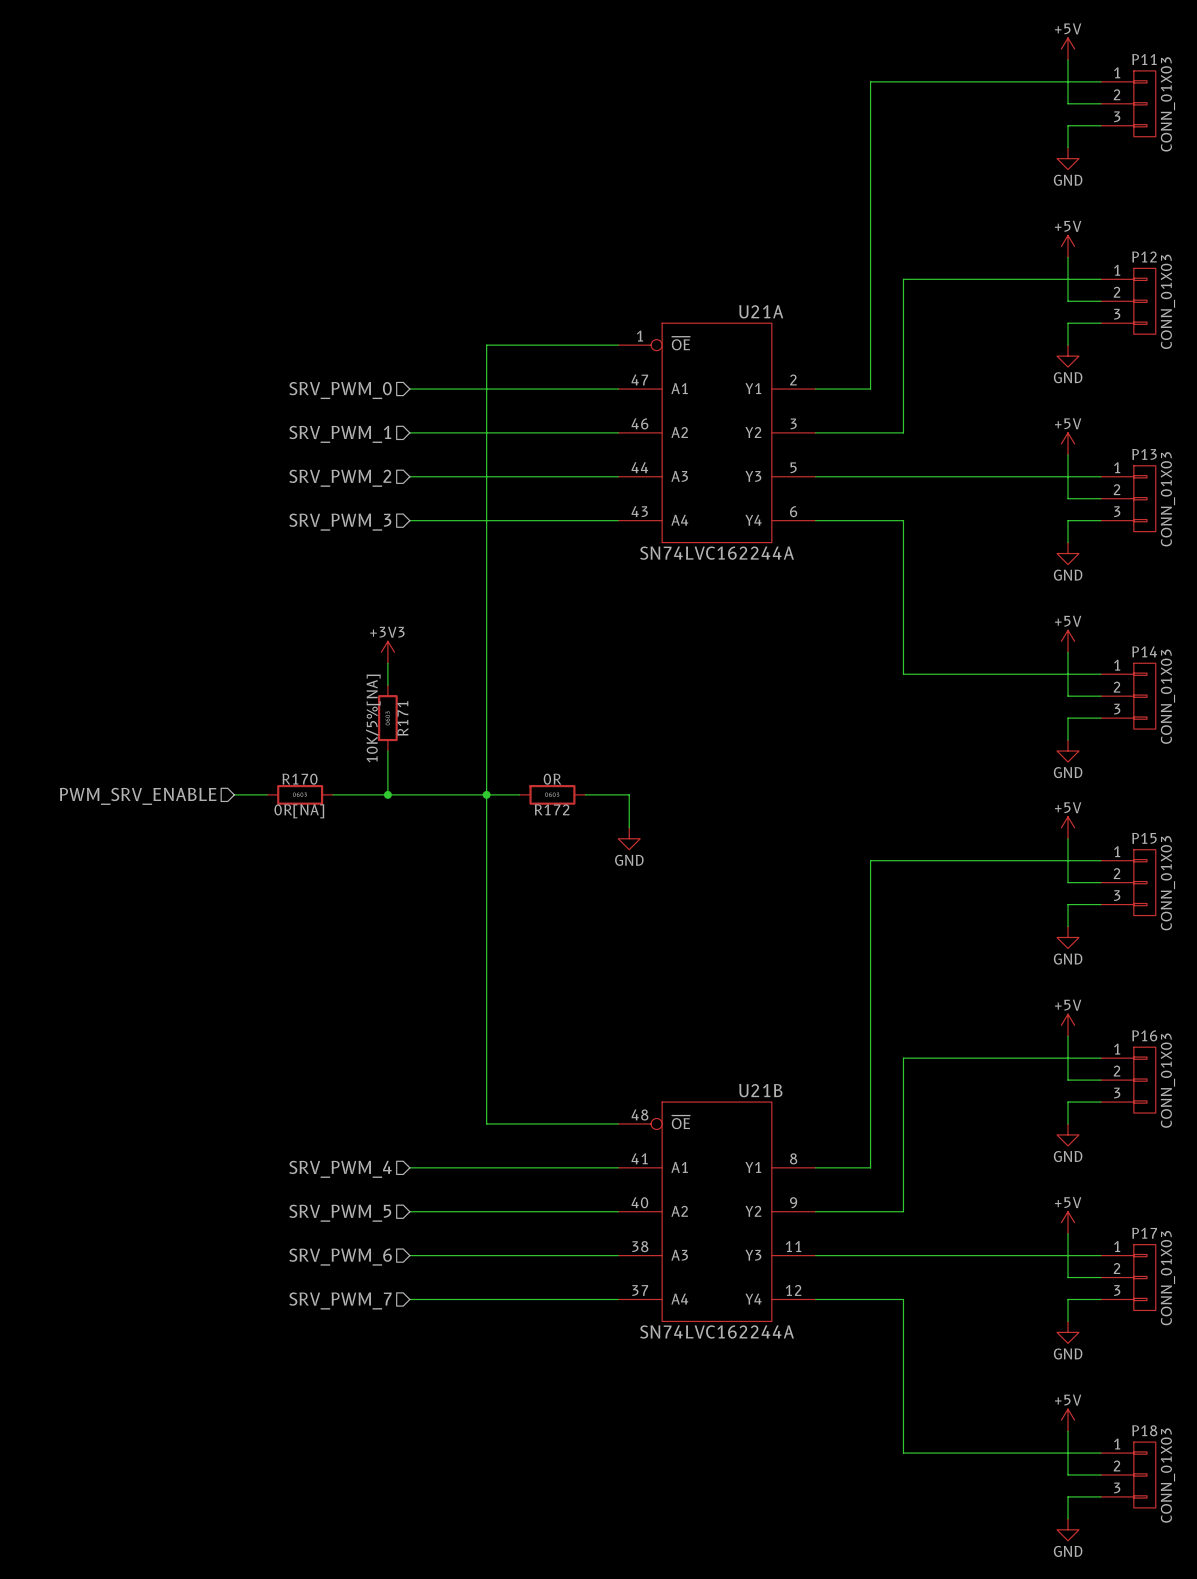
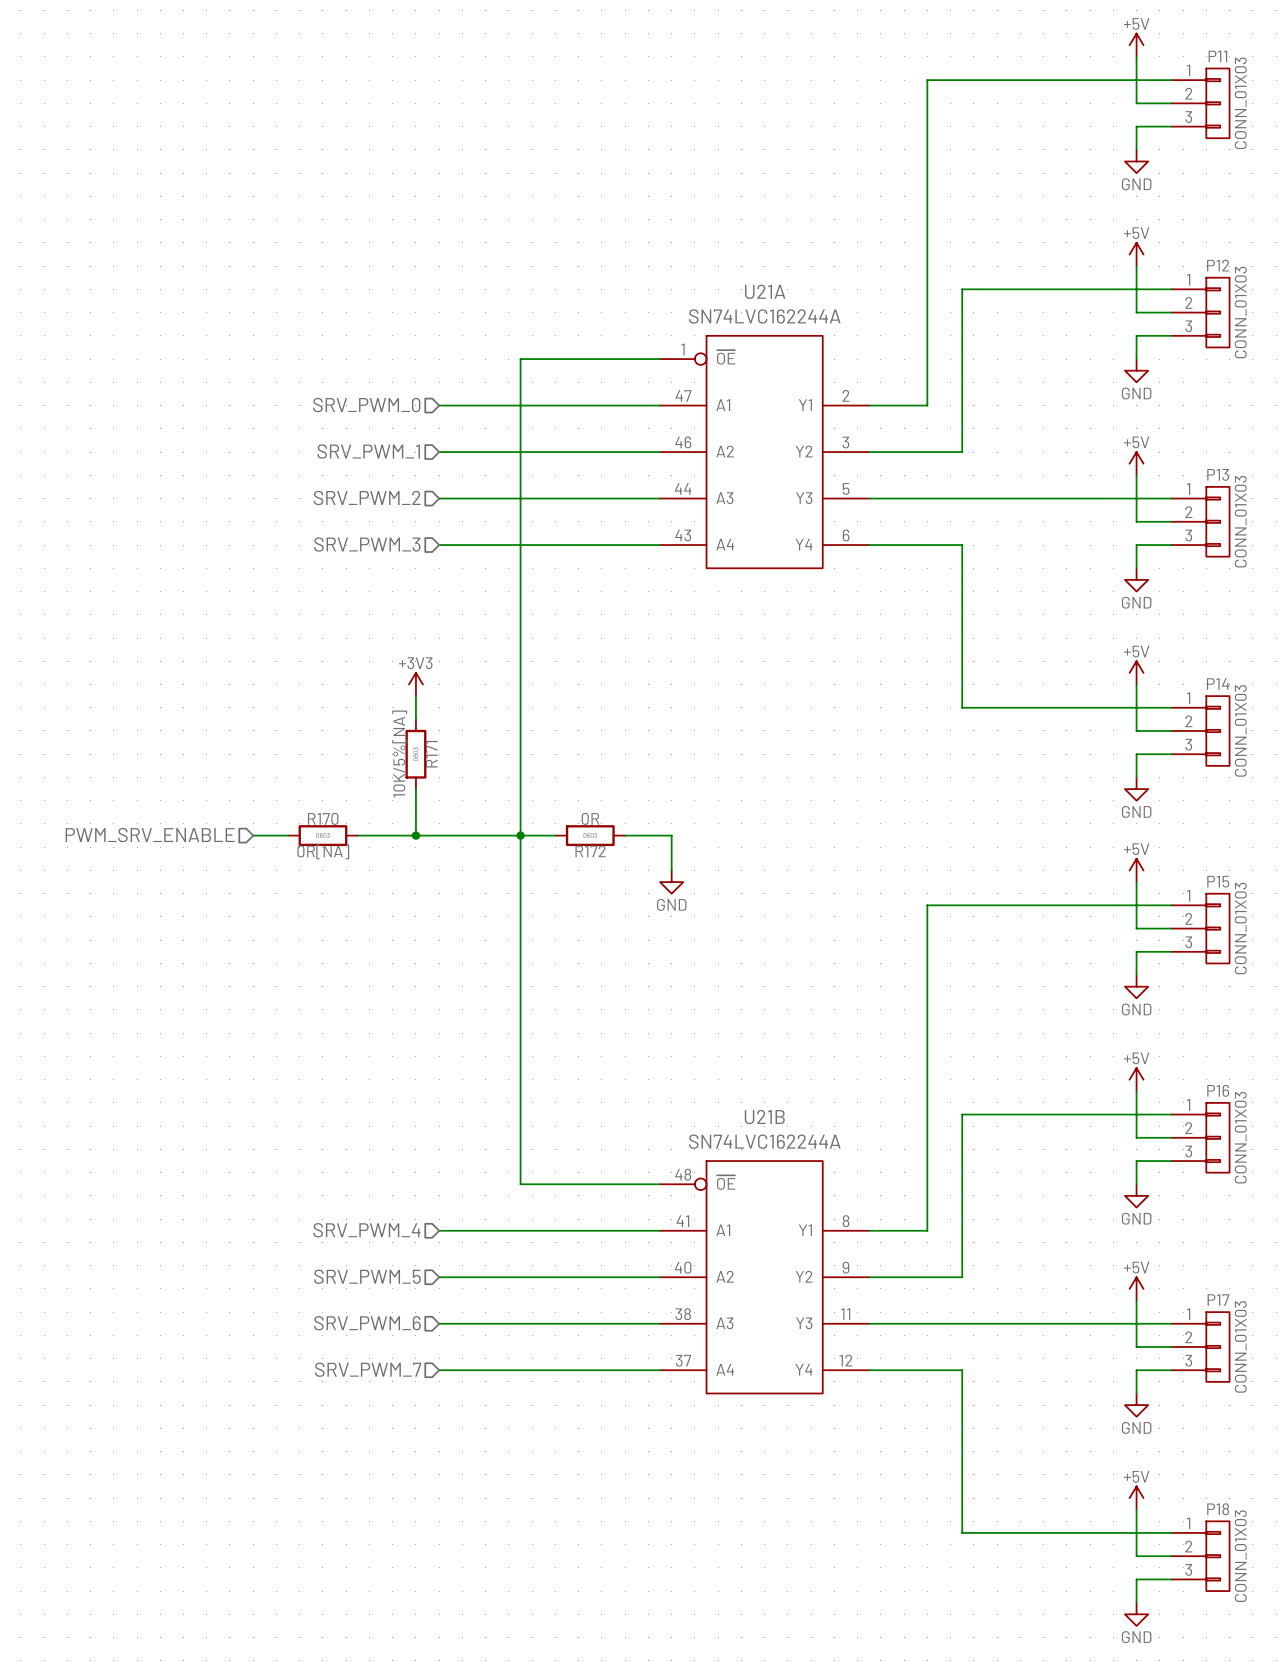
U21A name position: U21A (761, 311) -> U21A (765, 291)
U21A value position: SN74LVC162244A (717, 553) -> SN74LVC162244A (764, 316)
U21B name position: U21B (760, 1090) -> U21B (764, 1117)
U21B value position: SN74LVC162244A (717, 1331) -> SN74LVC162244A (764, 1141)

